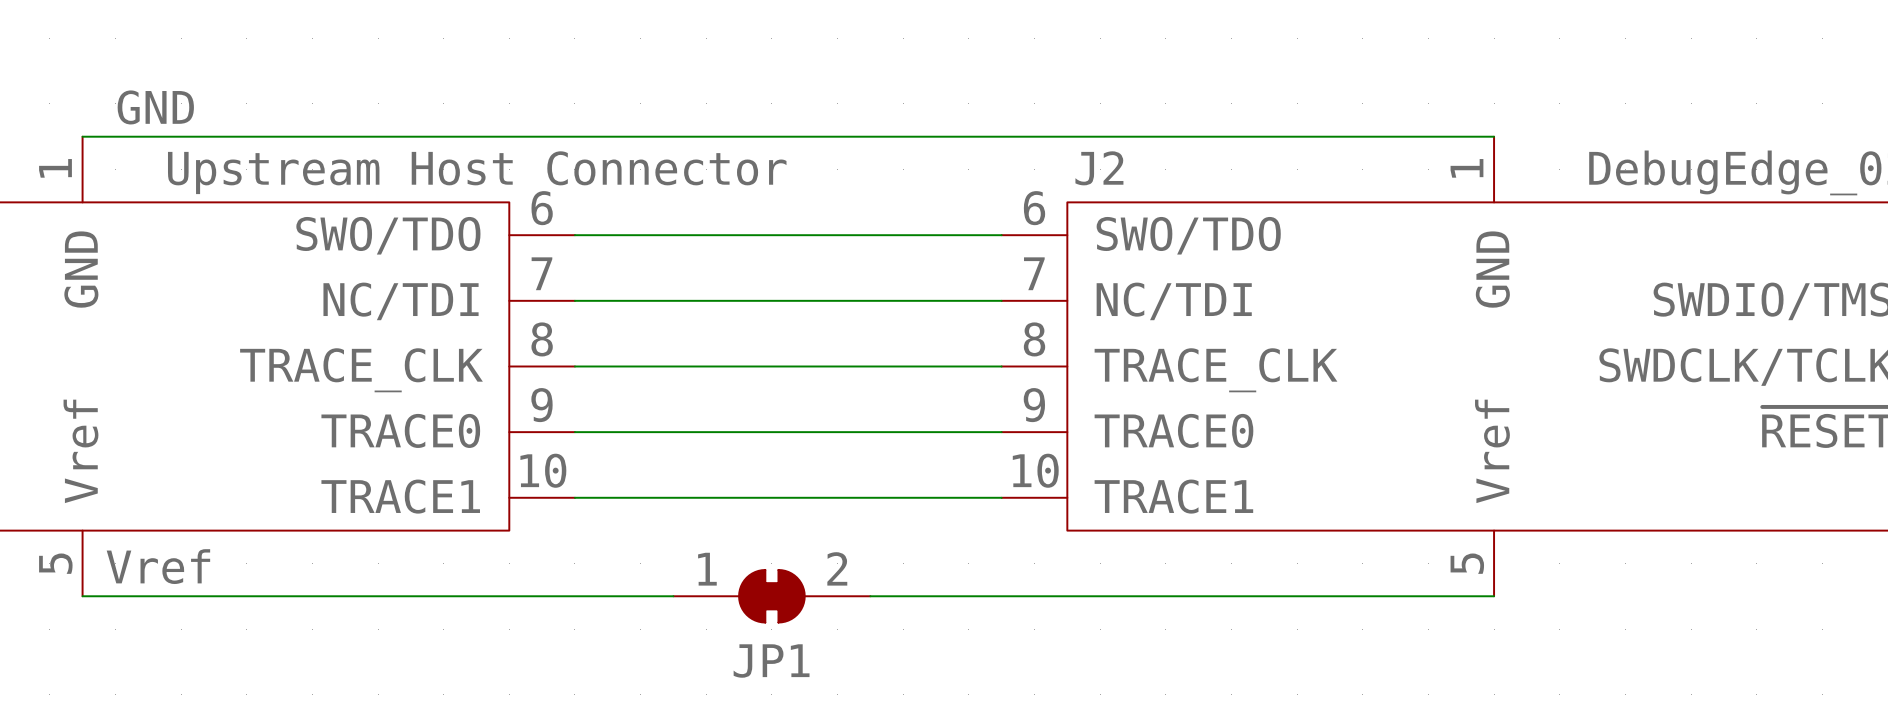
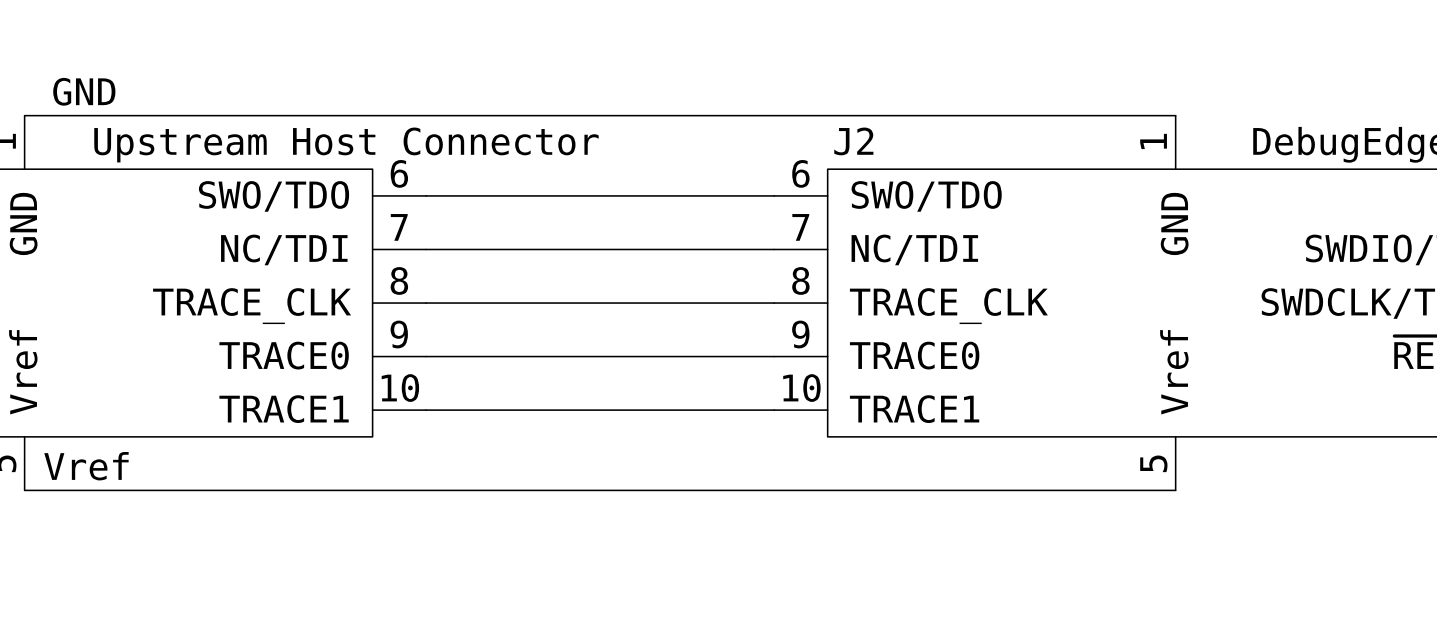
JP1: (771, 596) -> none

